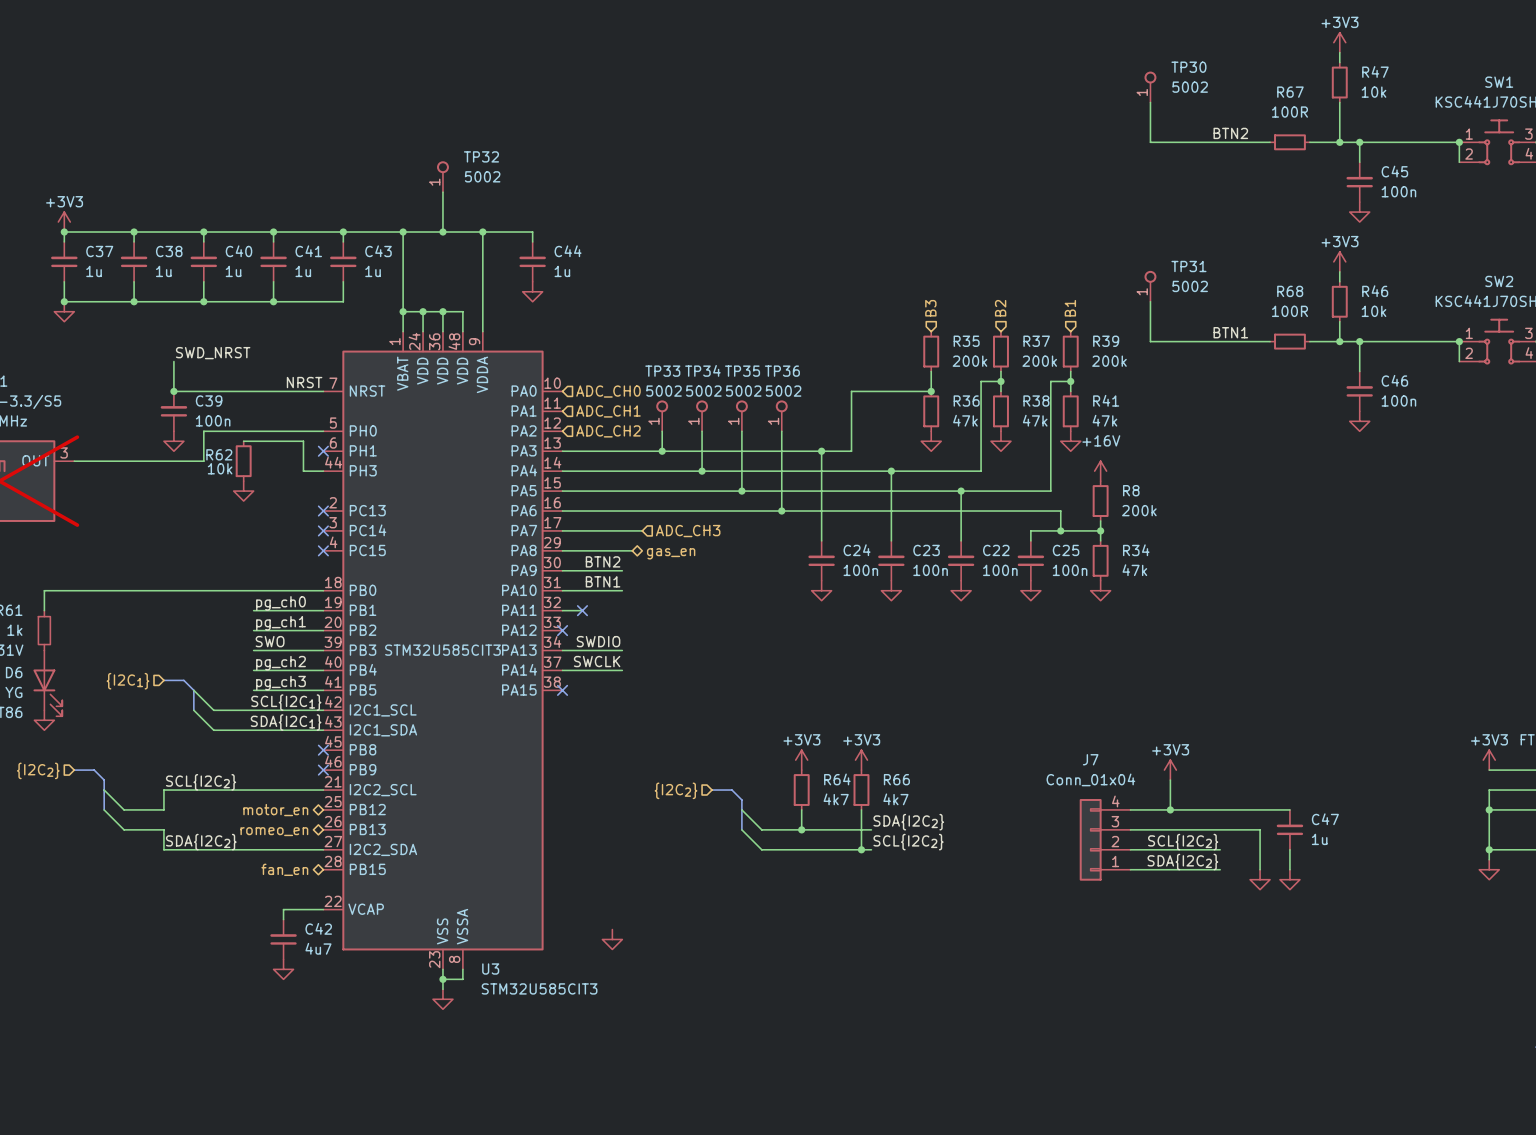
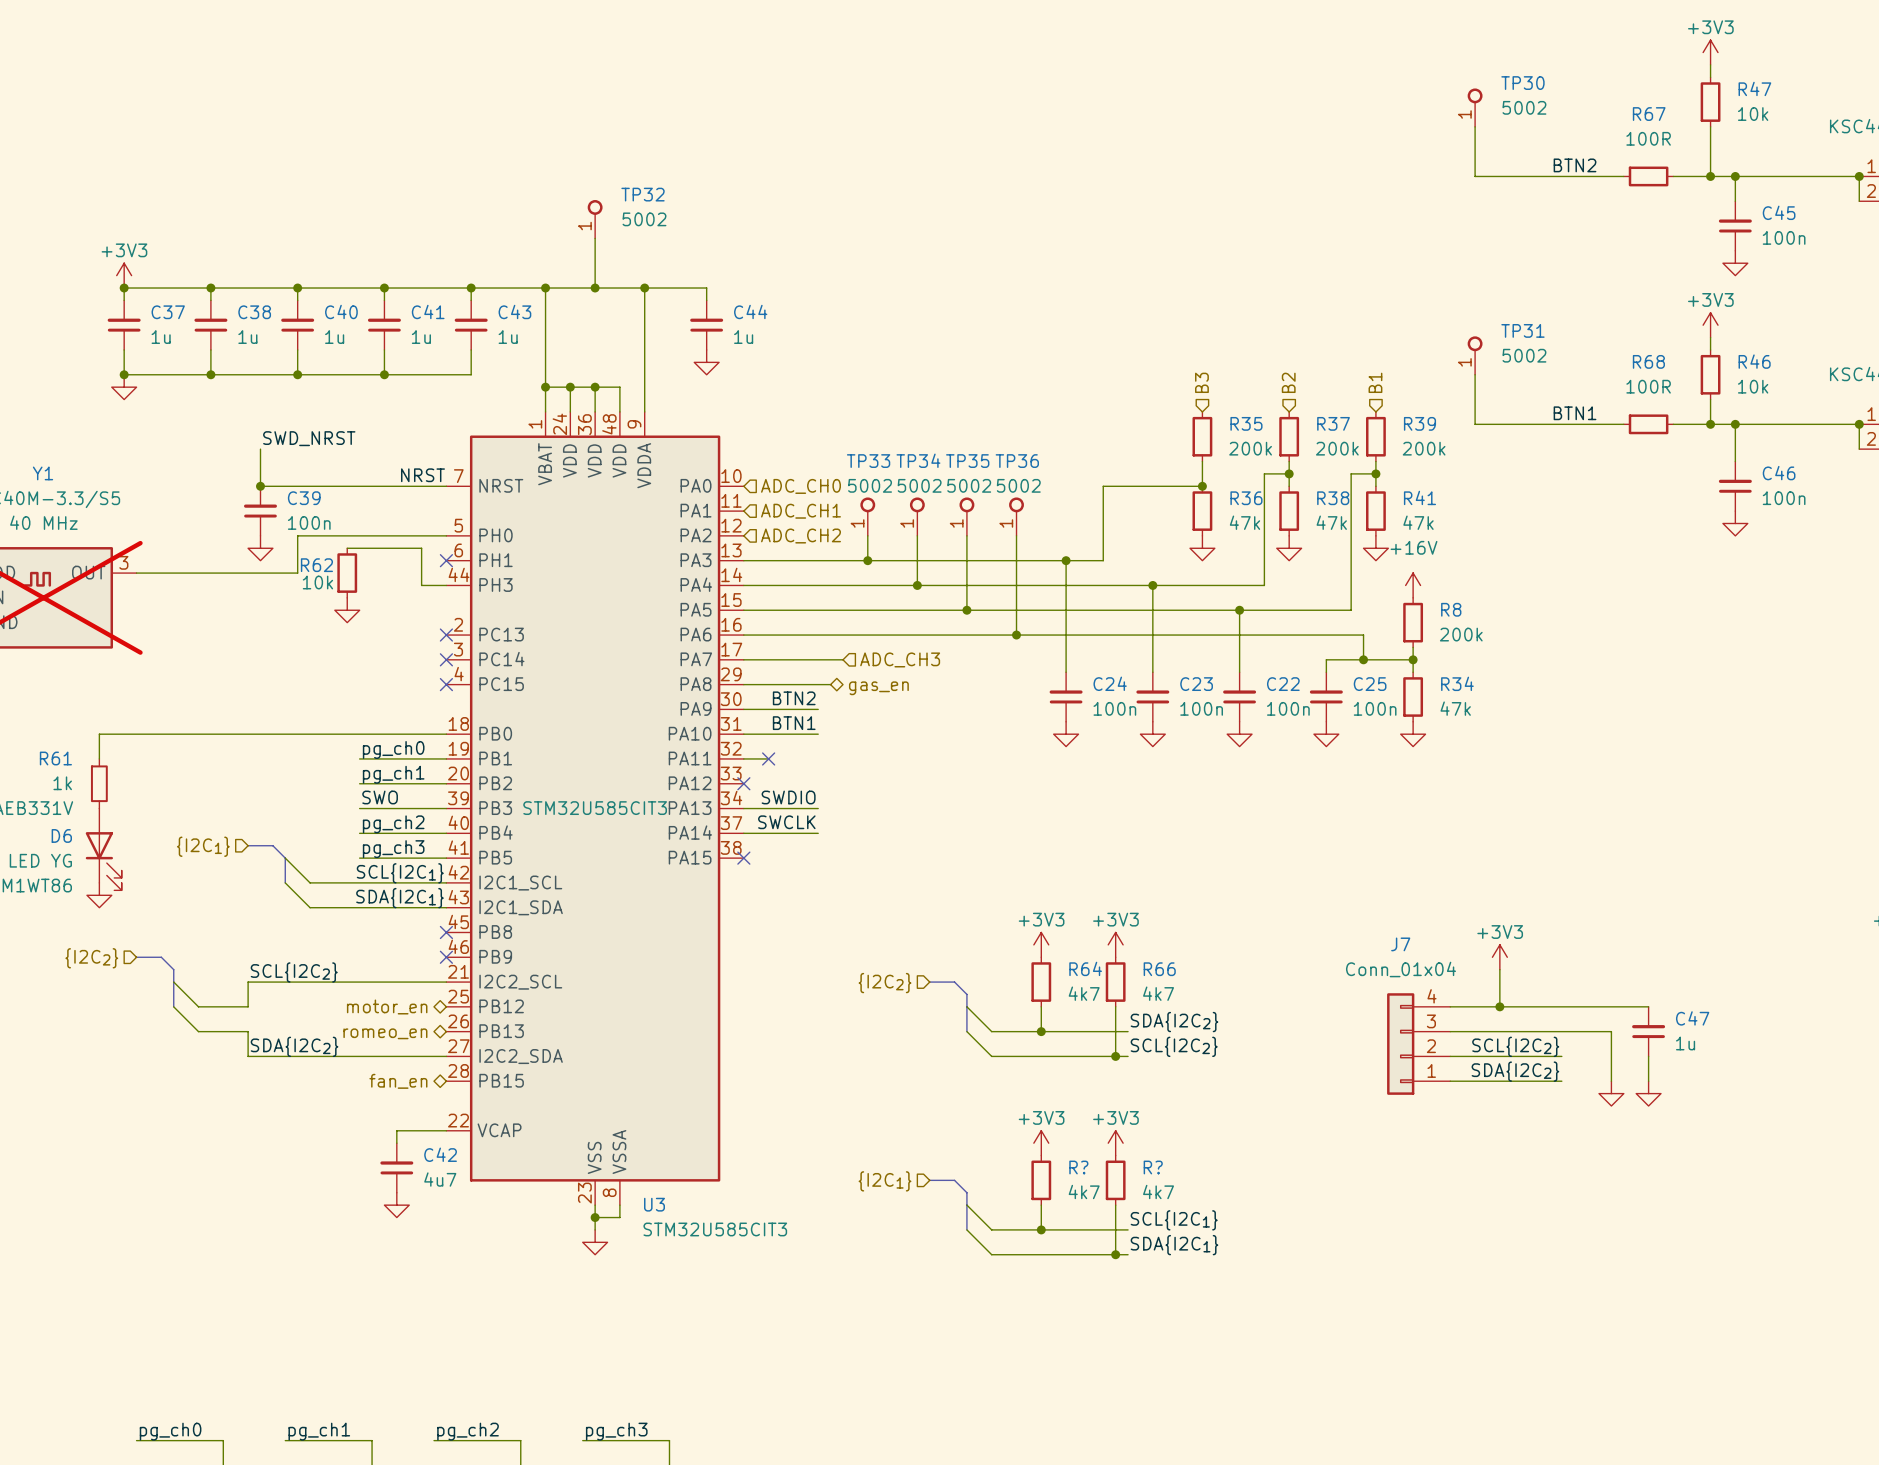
power symbol: none -> +3V3 (1041, 1143)
power symbol: none -> +3V3 (1115, 1143)
power symbol: (612, 939) -> none
bus: none -> (929, 1180) (954, 1180) (966, 1192) (966, 1229)
R?: none -> (1041, 1180)
R?: none -> (1115, 1180)
hierarchical label: none -> {I2C1} (885, 1181)
wire: none -> (966, 1205) (991, 1229) (1128, 1229)
wire: none -> (1041, 1205) (1041, 1229)
wire: none -> (1115, 1205) (1115, 1254)
label: none -> SCL{I2C1} (1174, 1220)
wire: none -> (966, 1229) (991, 1254) (1128, 1254)
junction: none -> (1041, 1229)
label: none -> SDA{I2C1} (1174, 1245)
junction: none -> (1115, 1254)

